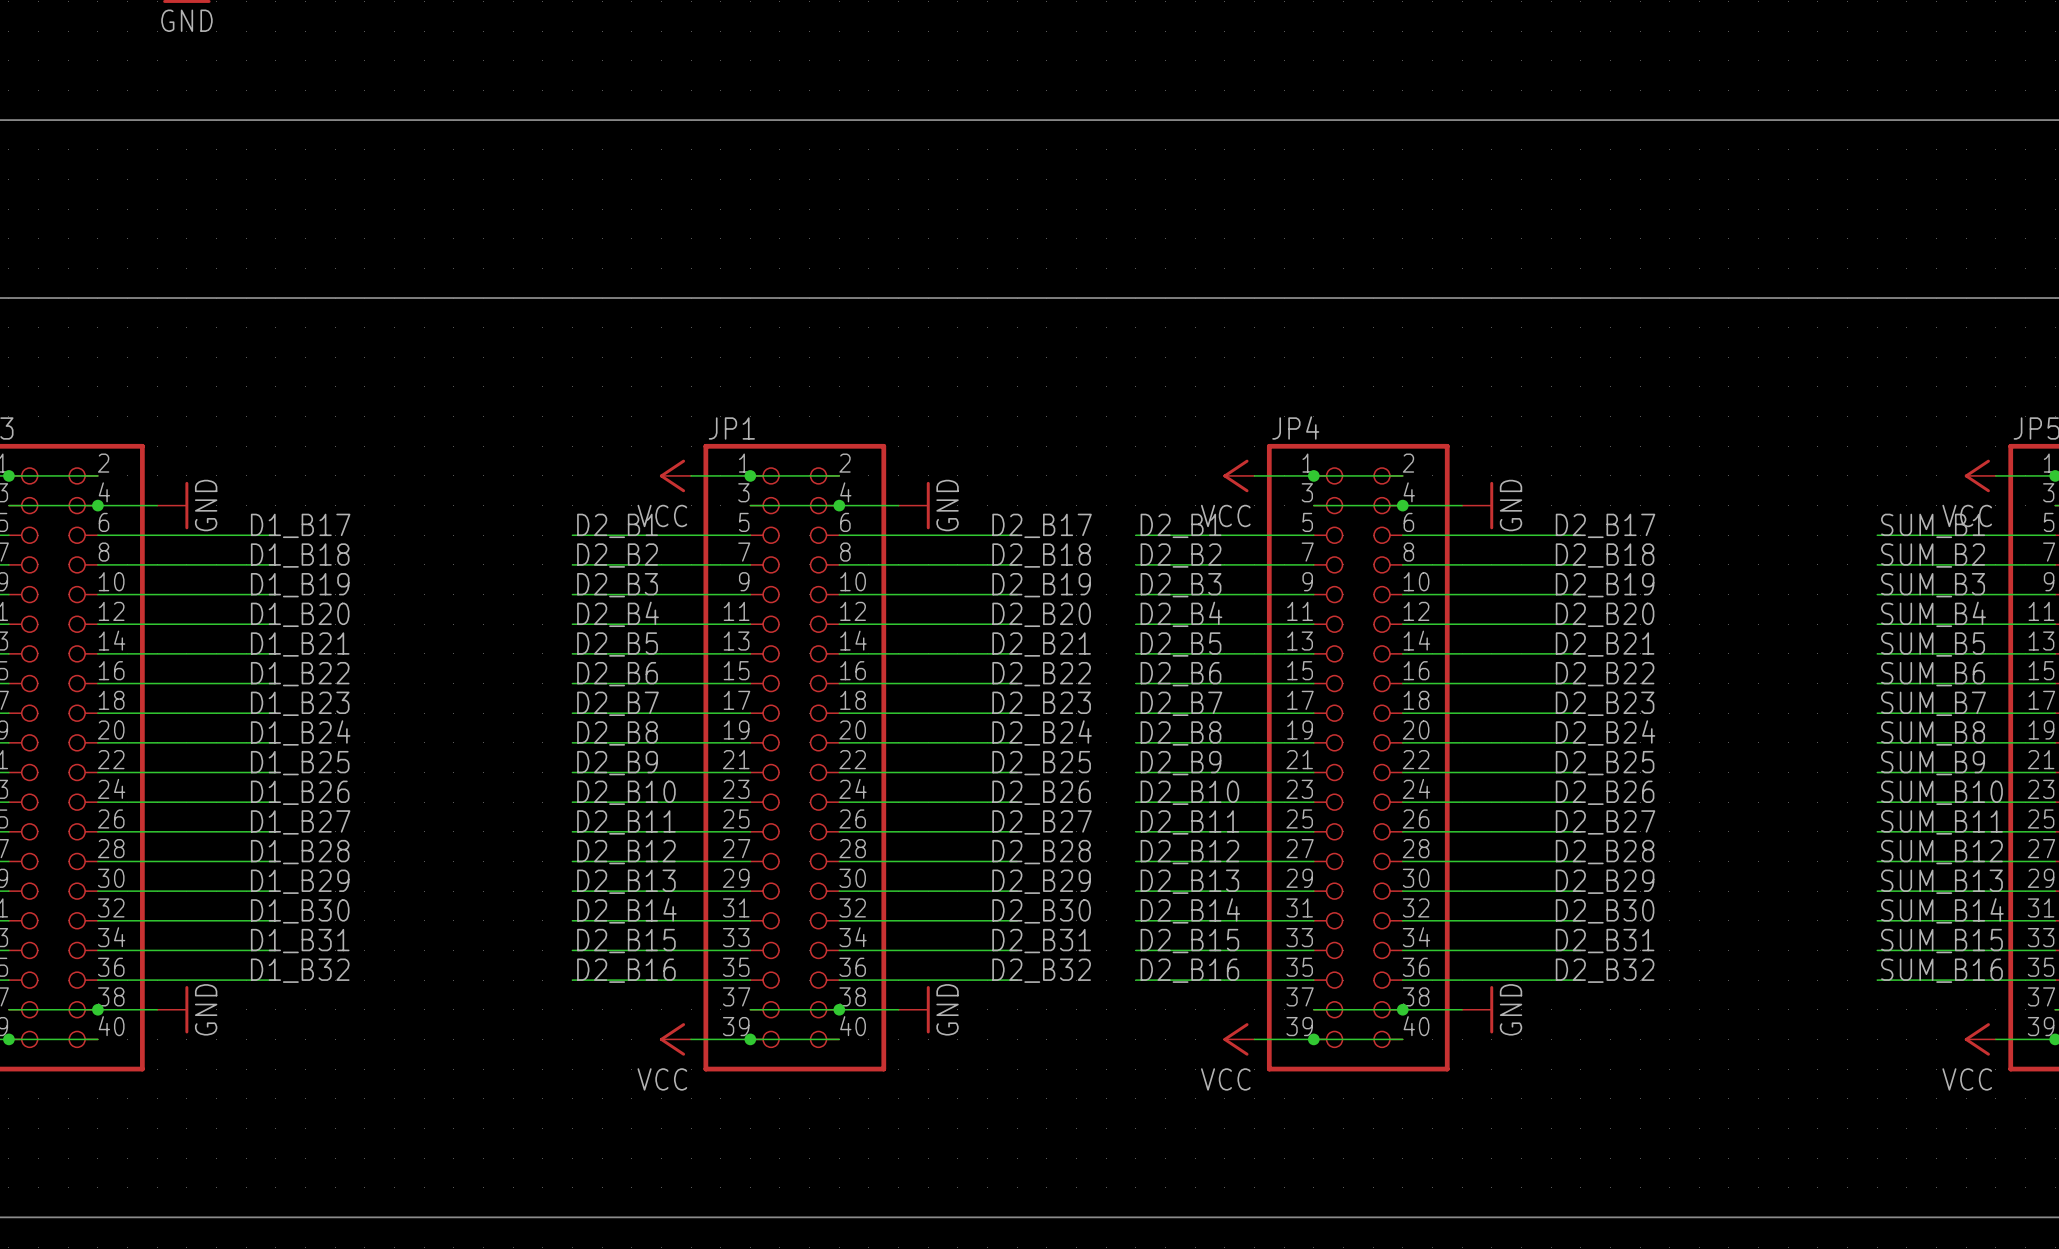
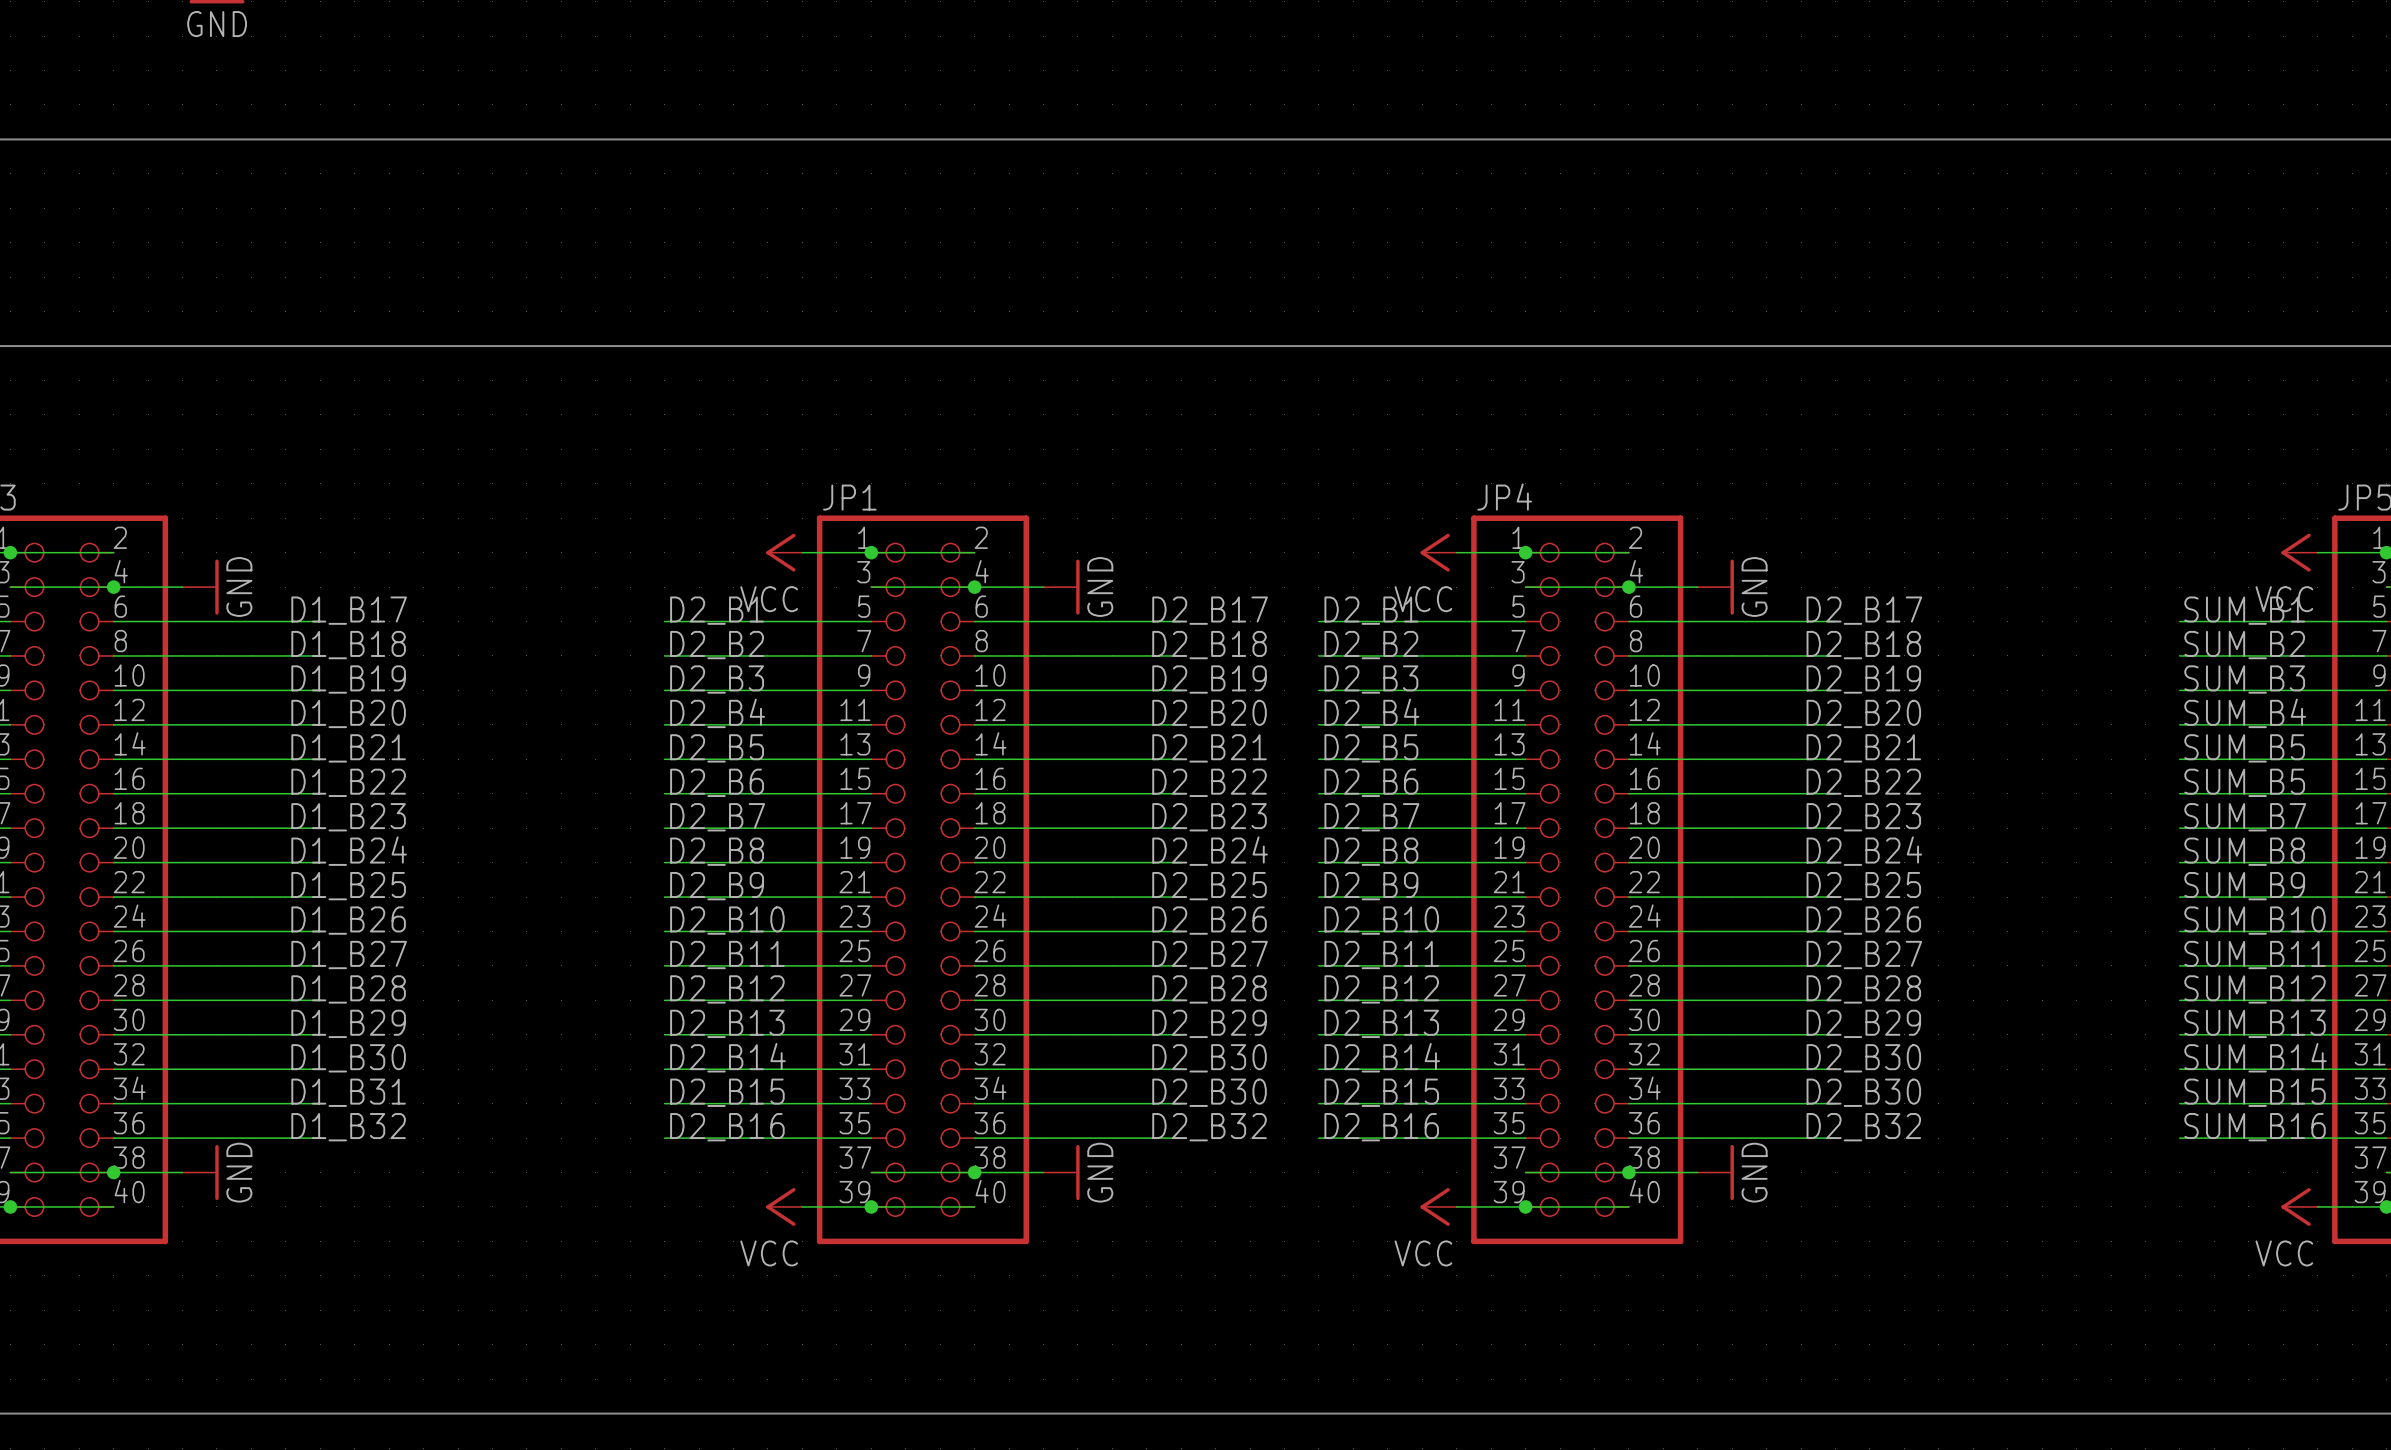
label: SUM_B6 (1933, 674) -> SUM_B5 (2244, 782)
label: D2_B31 (1041, 941) -> D2_B30 (1209, 1092)
label: D2_B31 (1605, 941) -> D2_B30 (1863, 1092)

